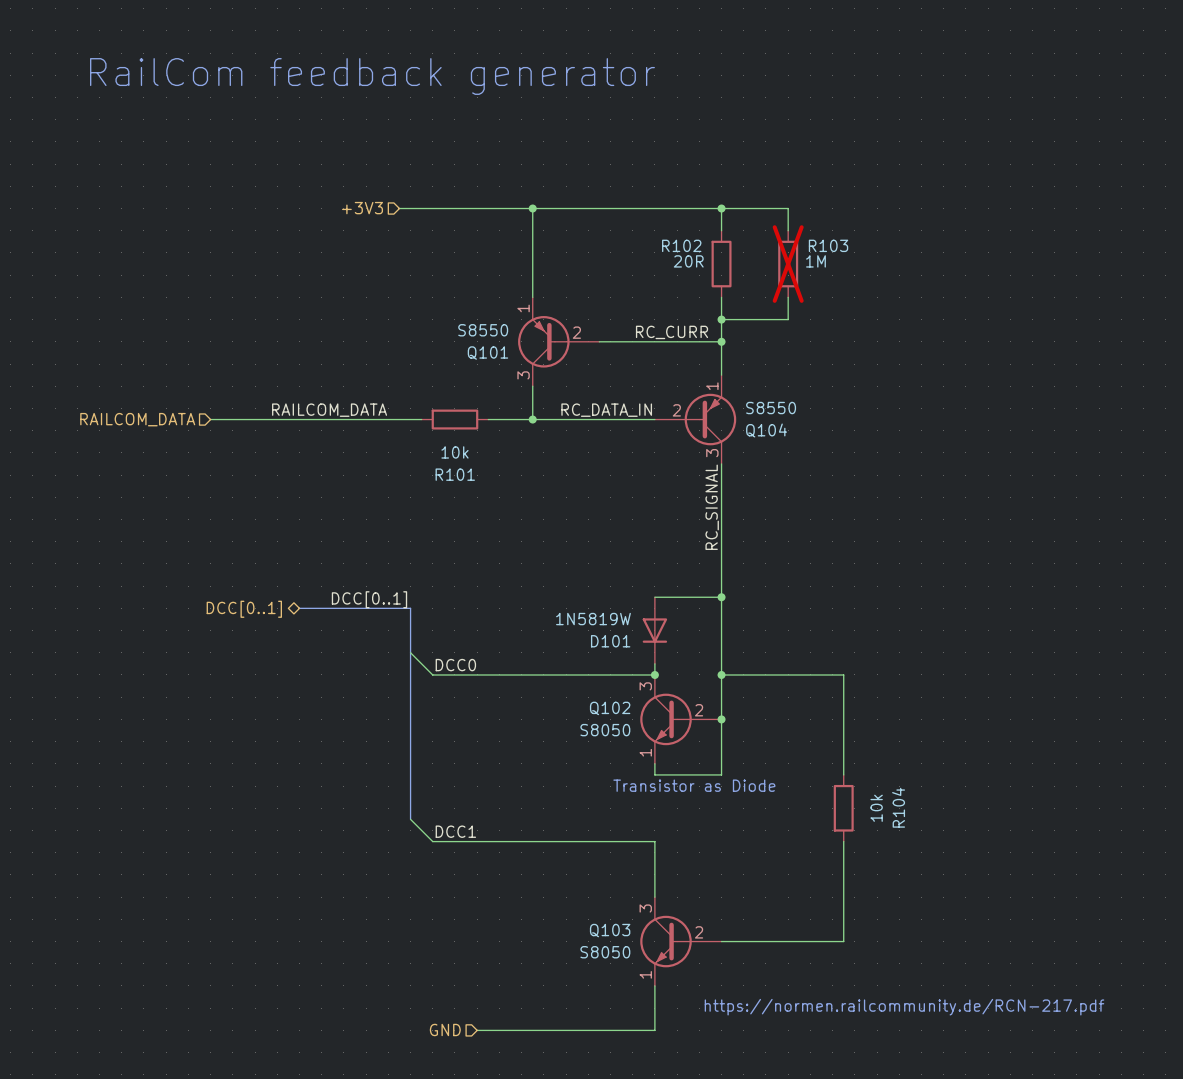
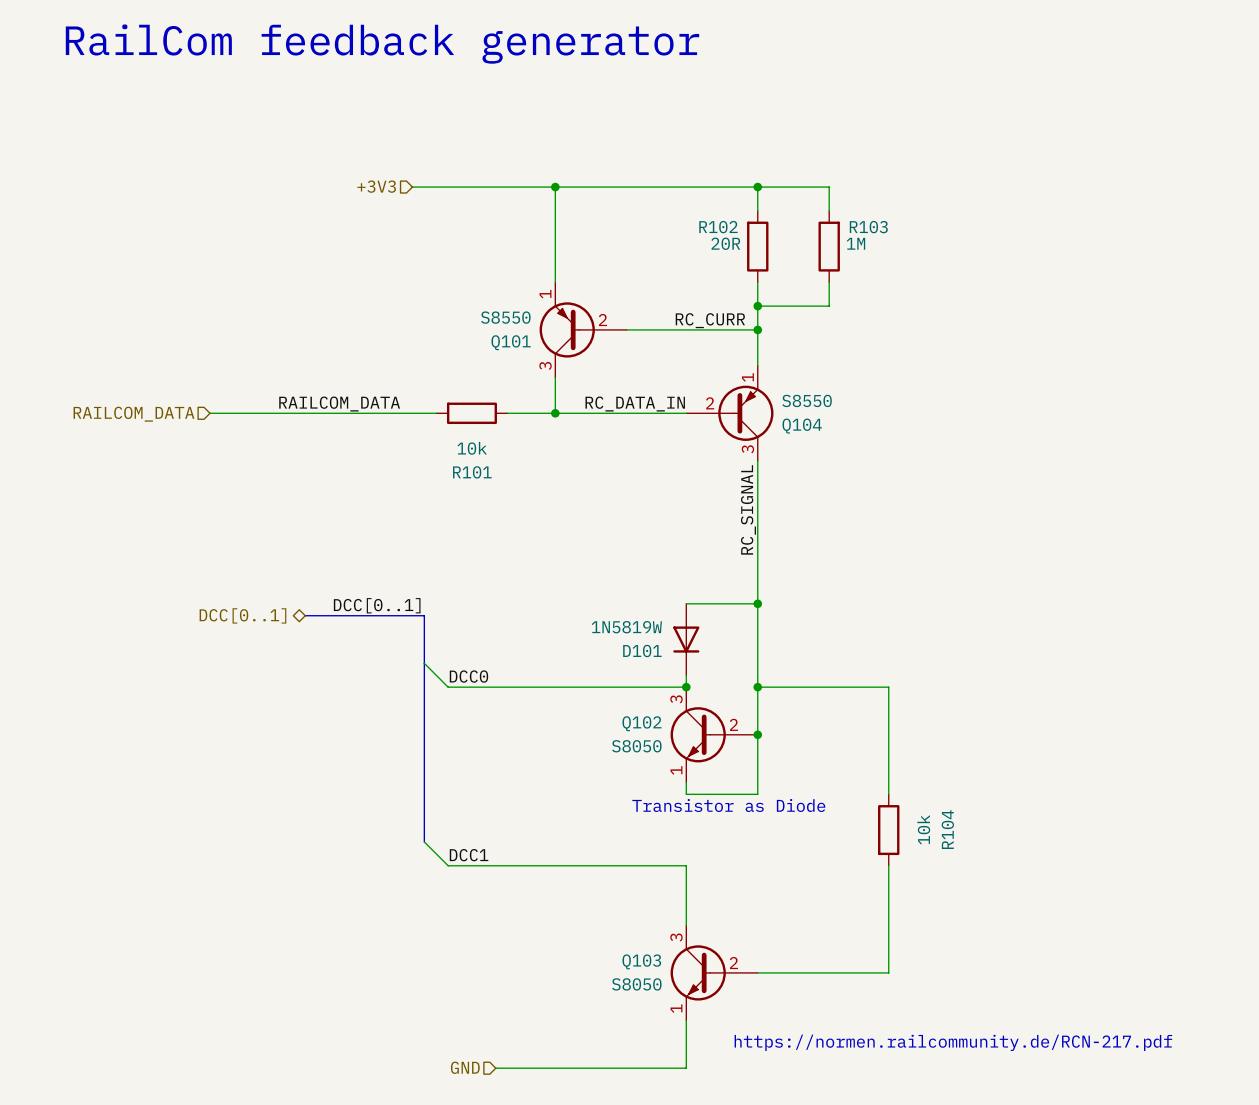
R103 do-not-place cross: (788, 264) -> none

